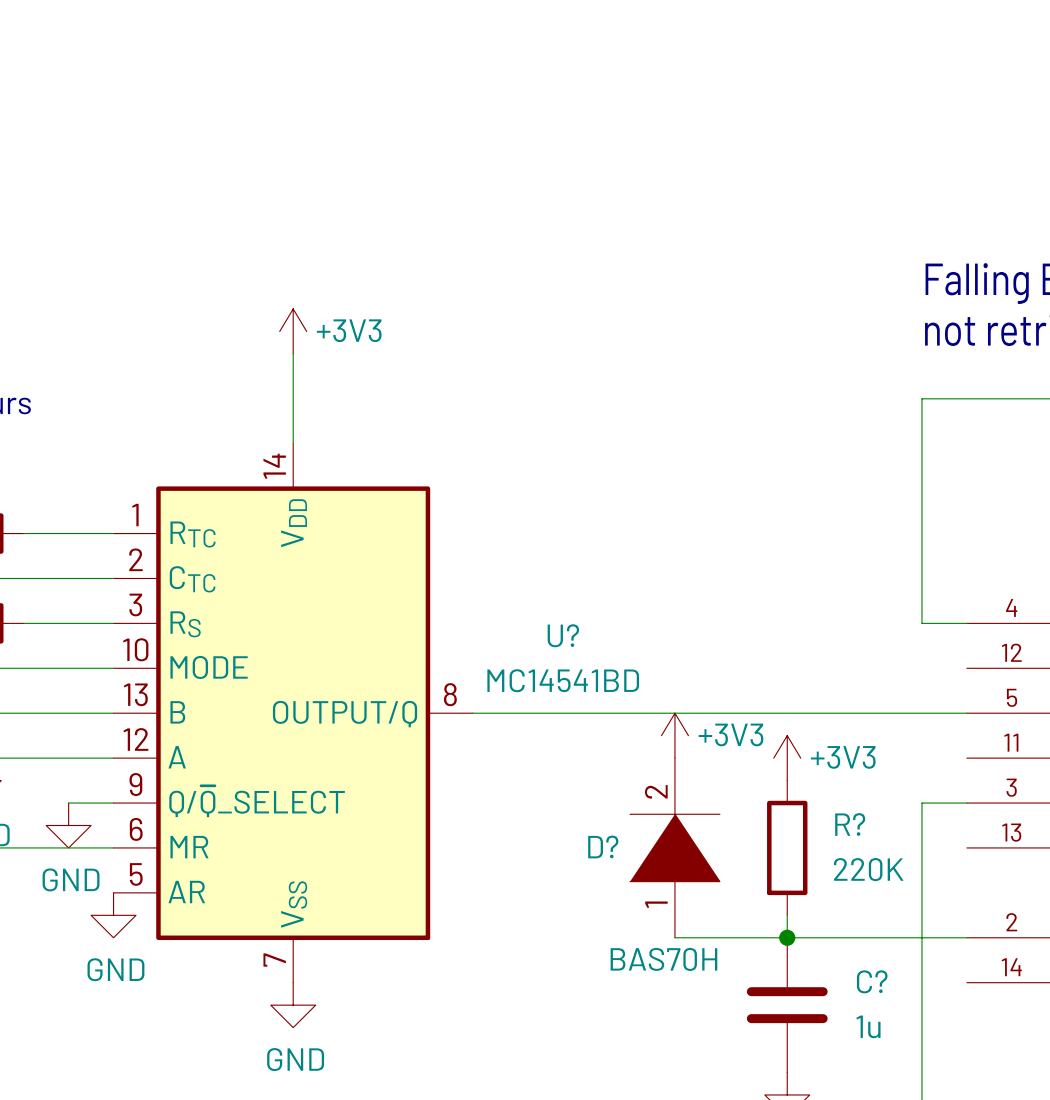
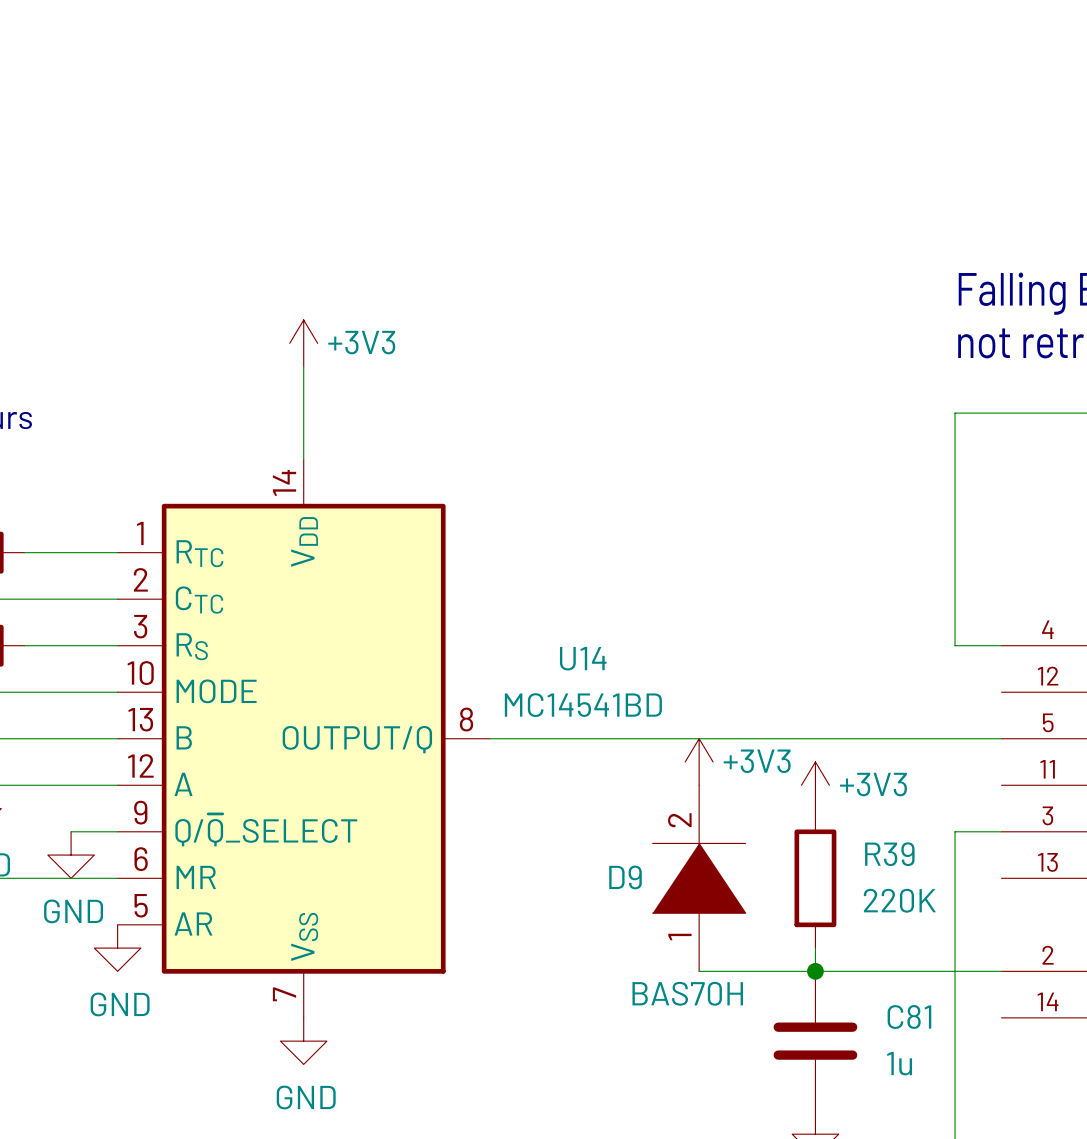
U? name: U? (563, 635) -> U14 (583, 658)
R? name: R? (850, 824) -> R39 (889, 854)
D? name: D? (603, 846) -> D9 (625, 877)
C? name: C? (872, 981) -> C81 (909, 1016)

